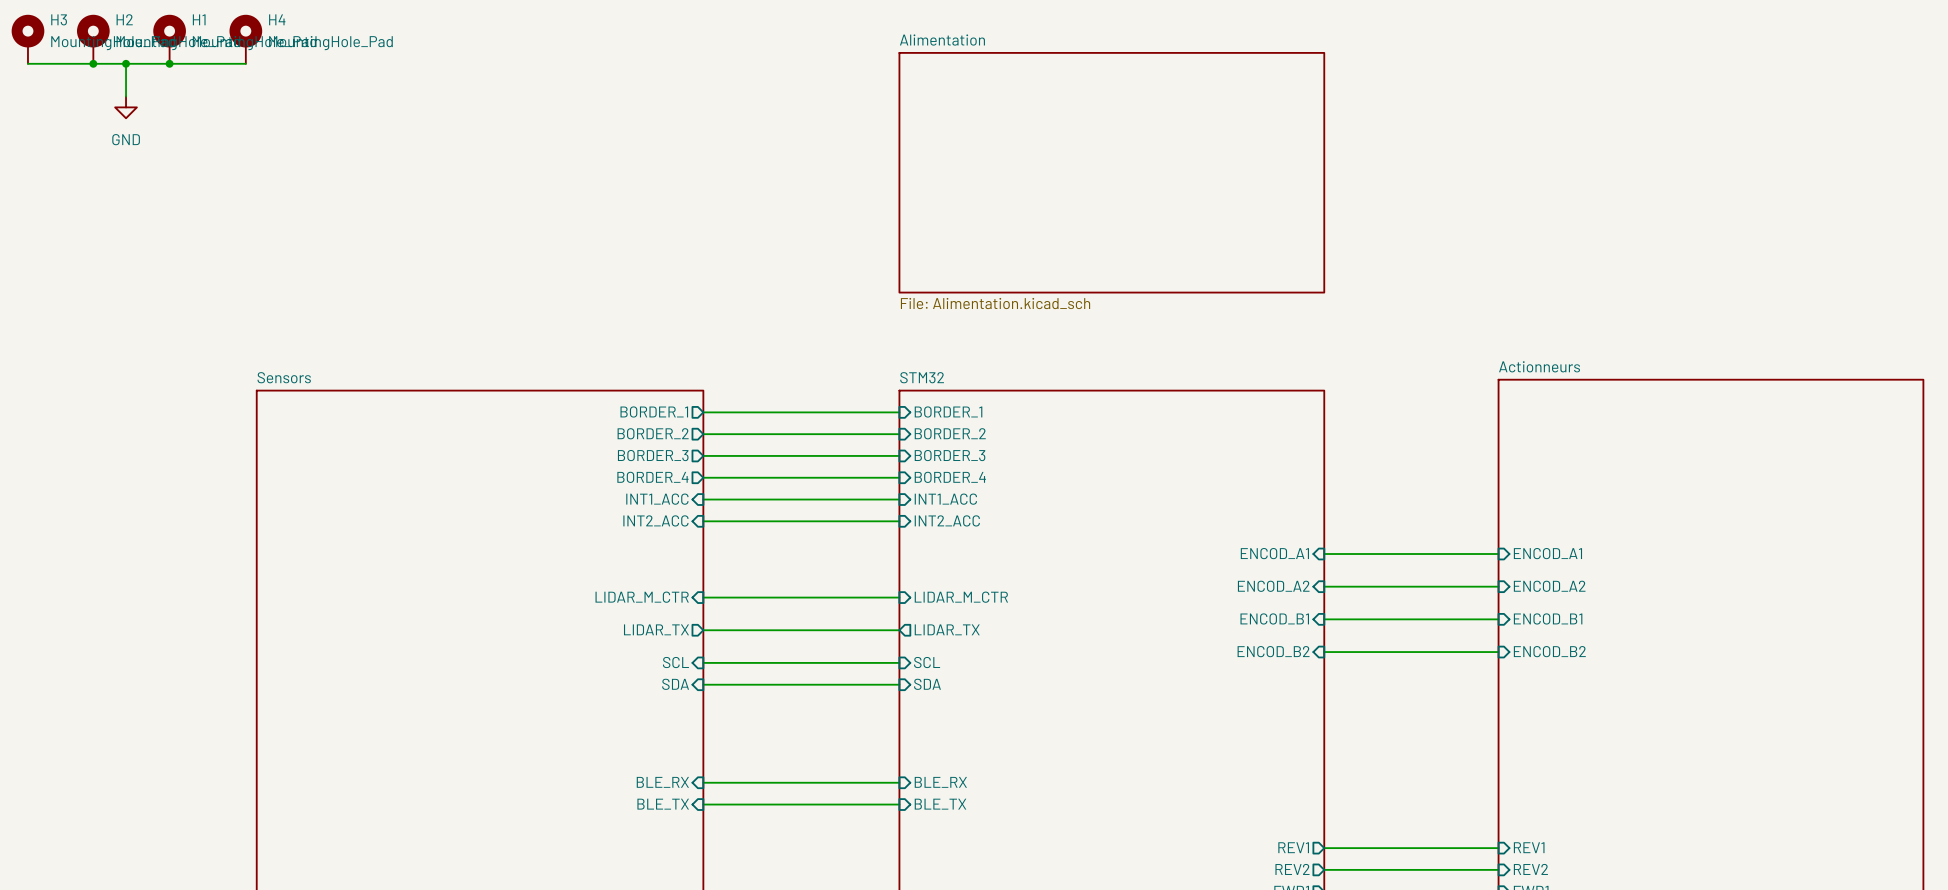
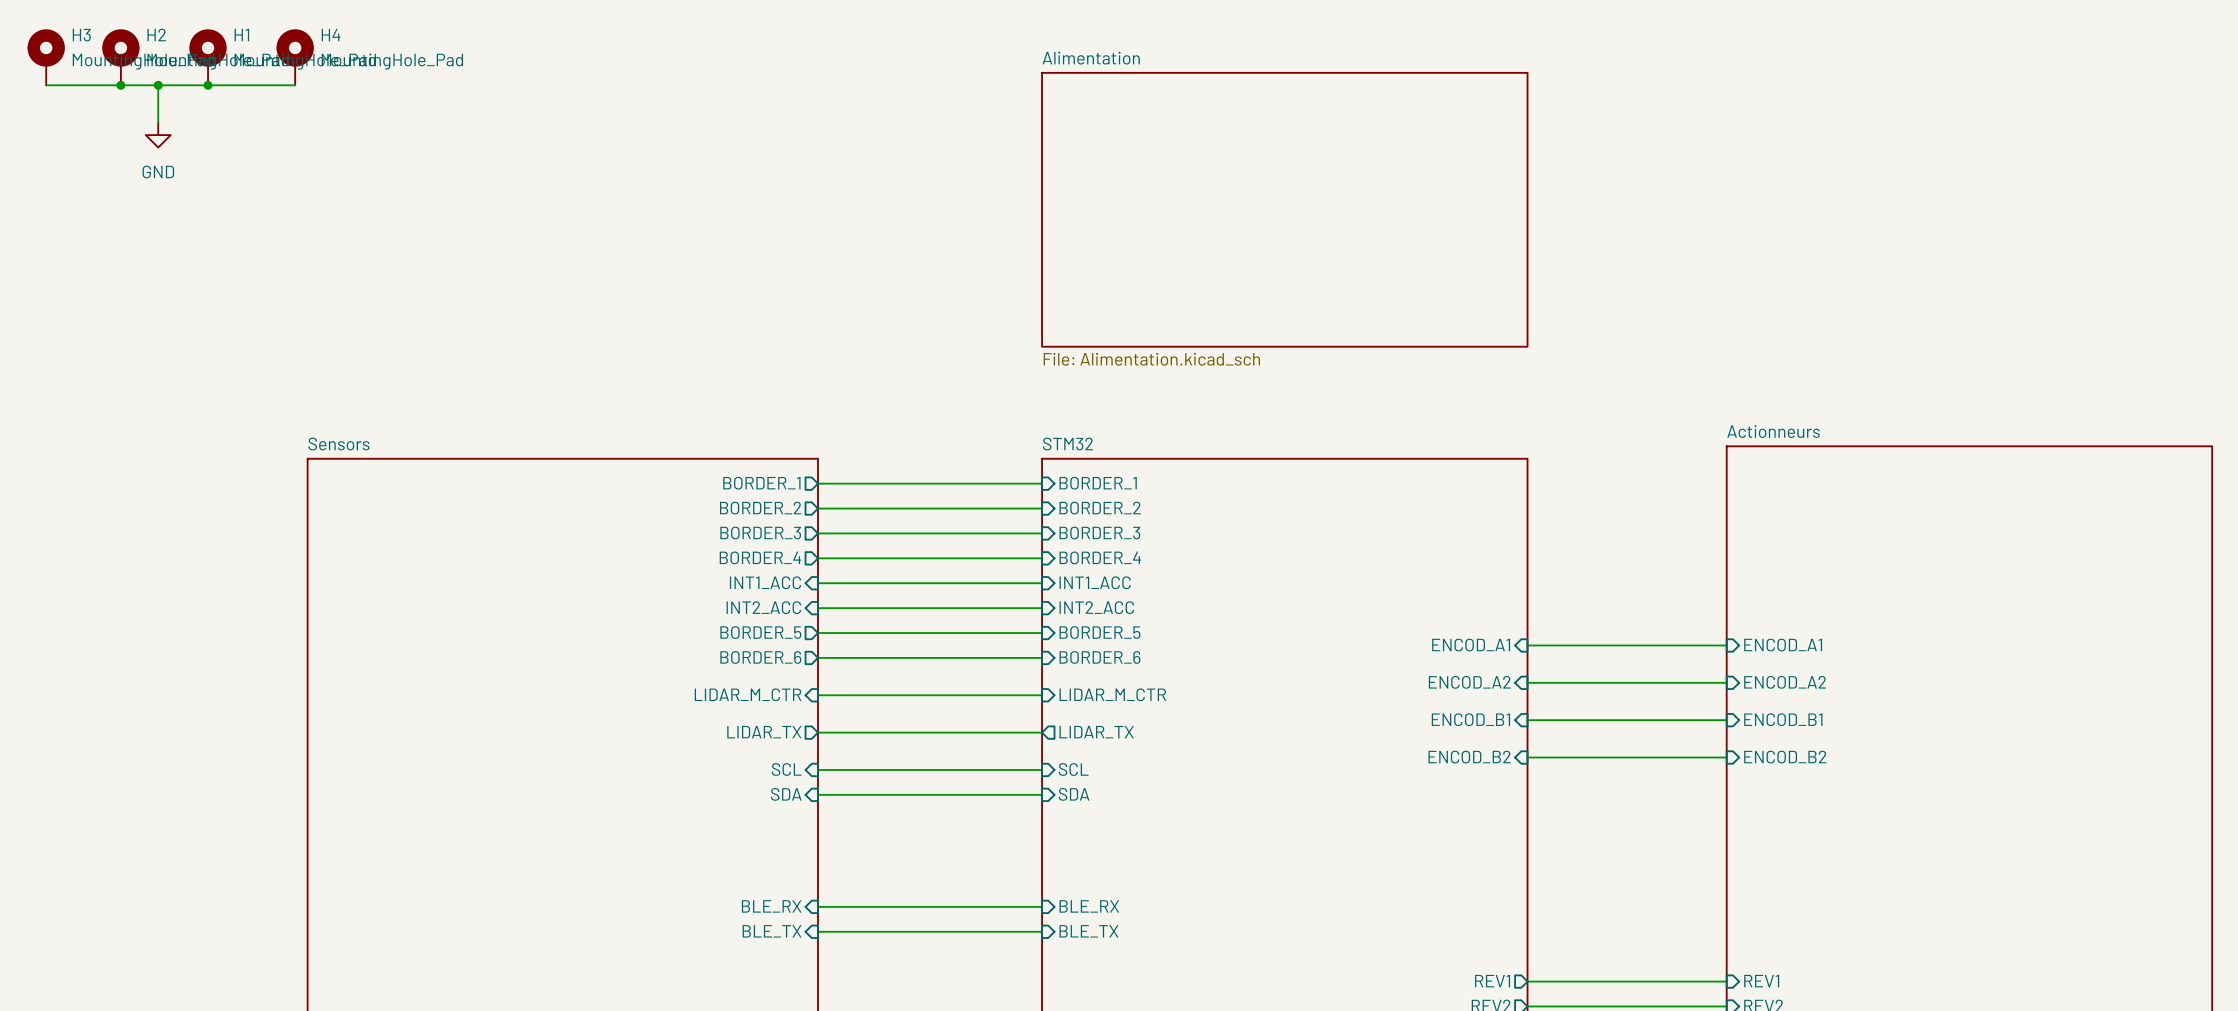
sheet pin: none -> BORDER_5 (760, 632)
sheet pin: none -> BORDER_5 (1099, 632)
wire: none -> (817, 633) (1042, 633)
sheet pin: none -> BORDER_6 (760, 657)
wire: none -> (817, 657) (1042, 657)
sheet pin: none -> BORDER_6 (1100, 657)

